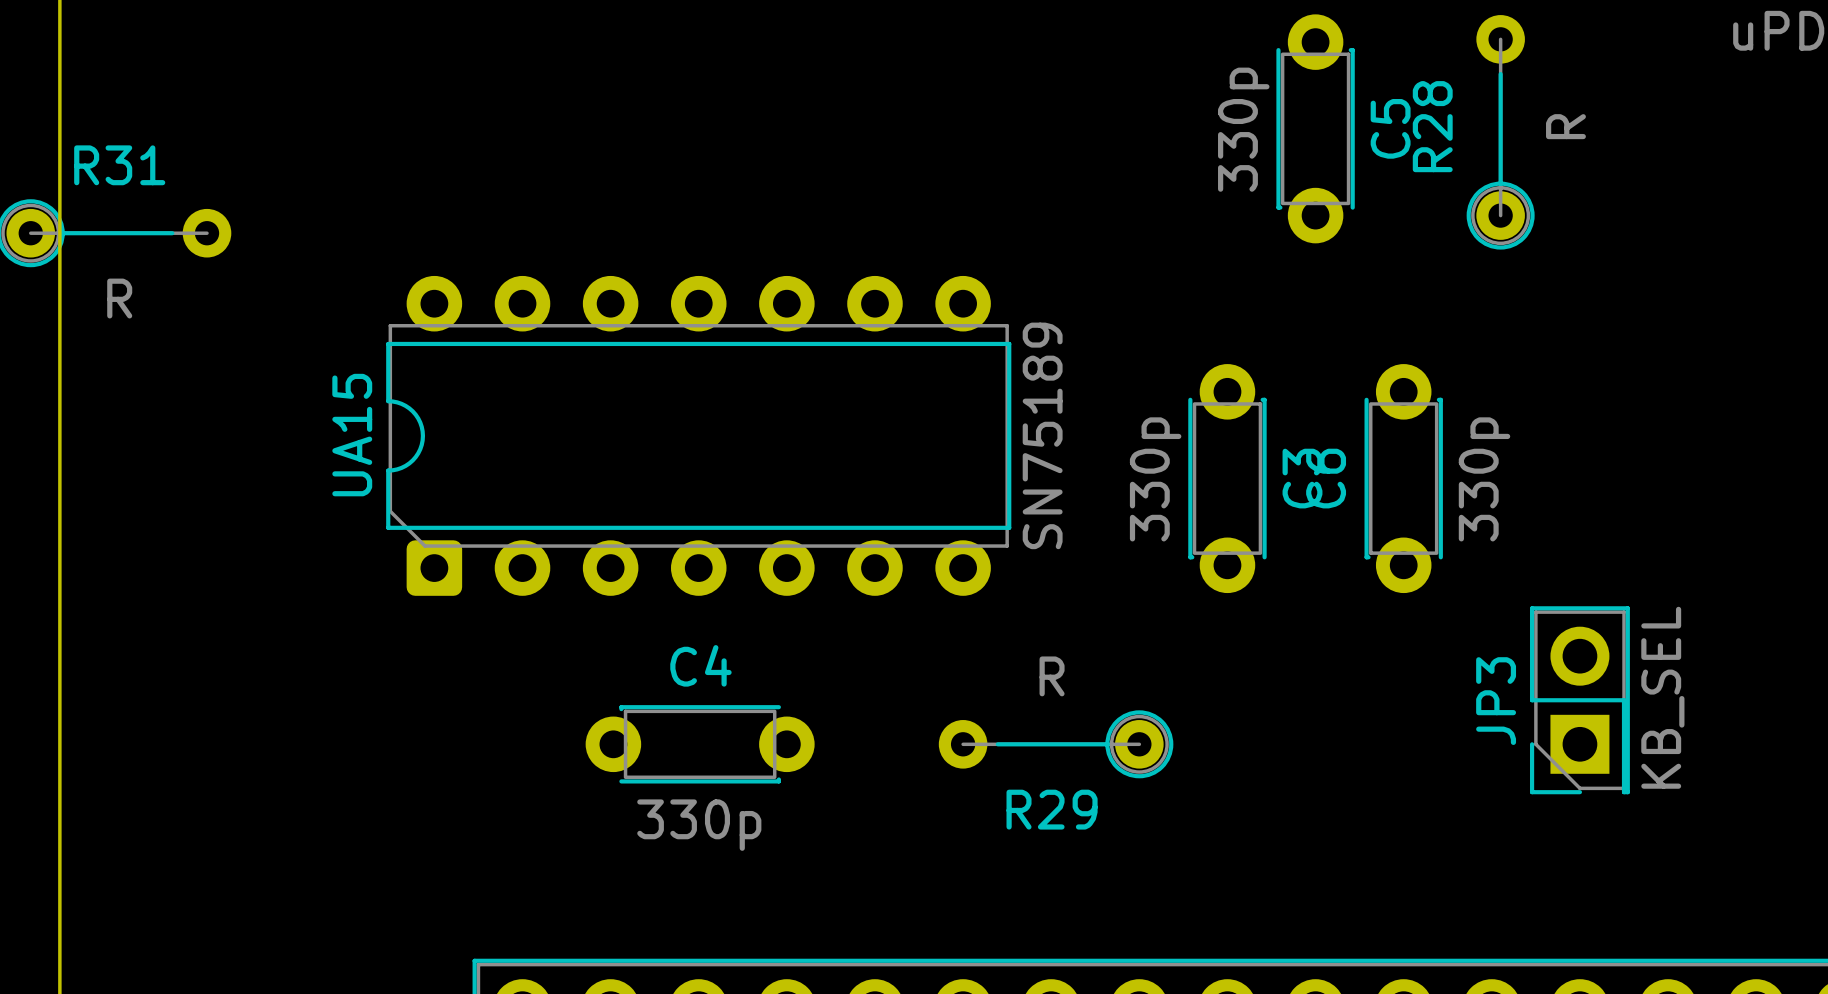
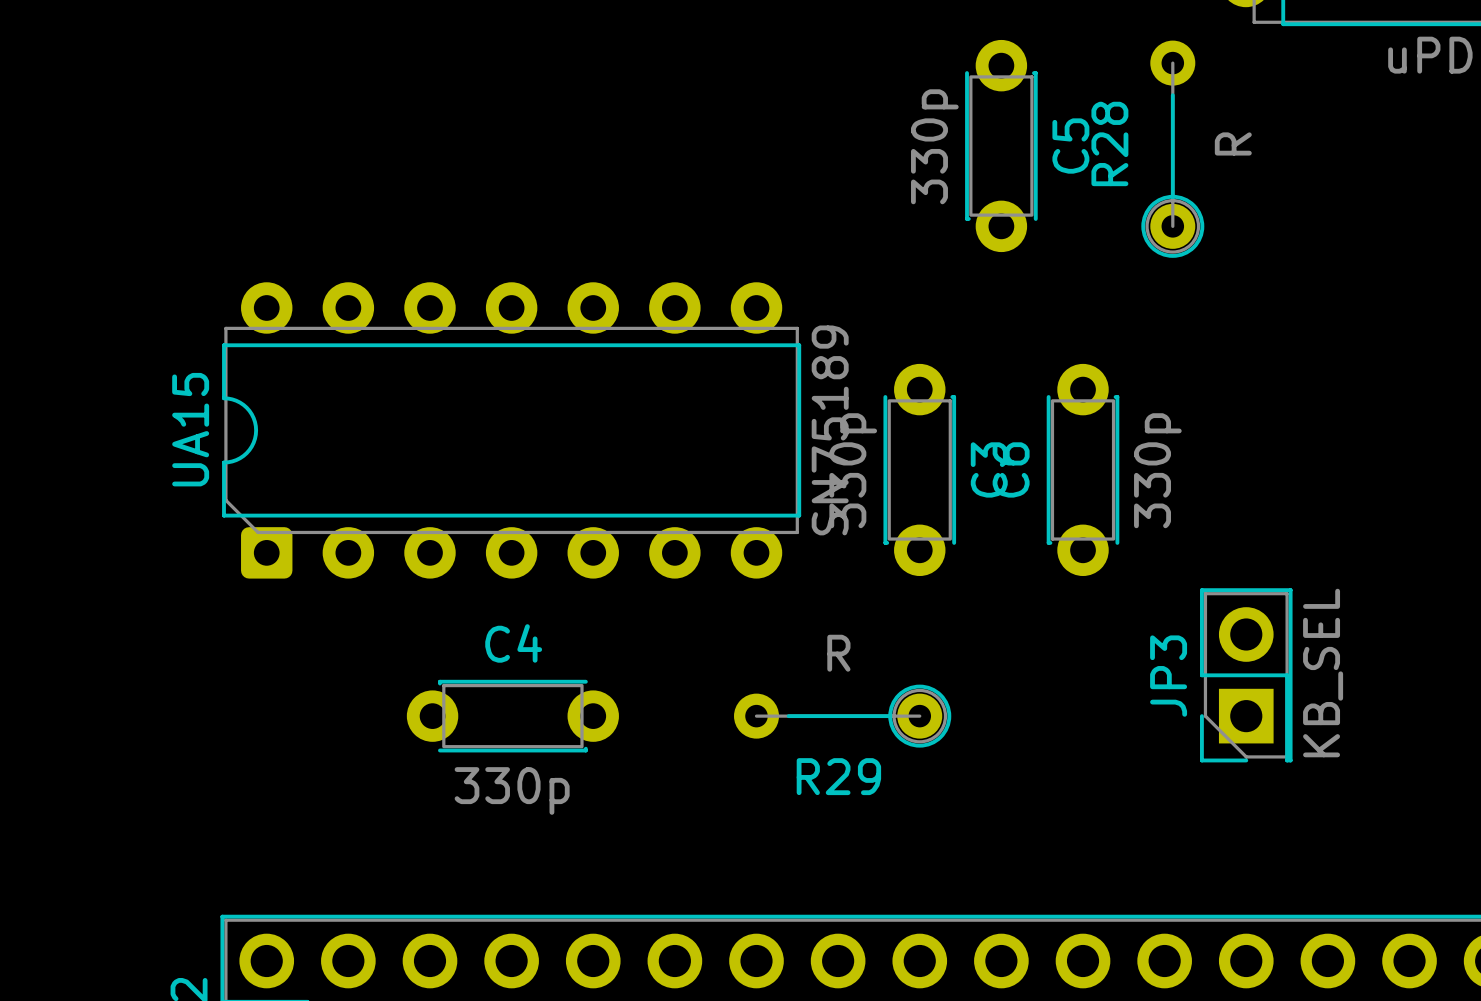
UA15 position: (698, 435) -> (511, 430)
C4 position: (700, 744) -> (512, 716)
R29 position: (1056, 744) -> (842, 716)

